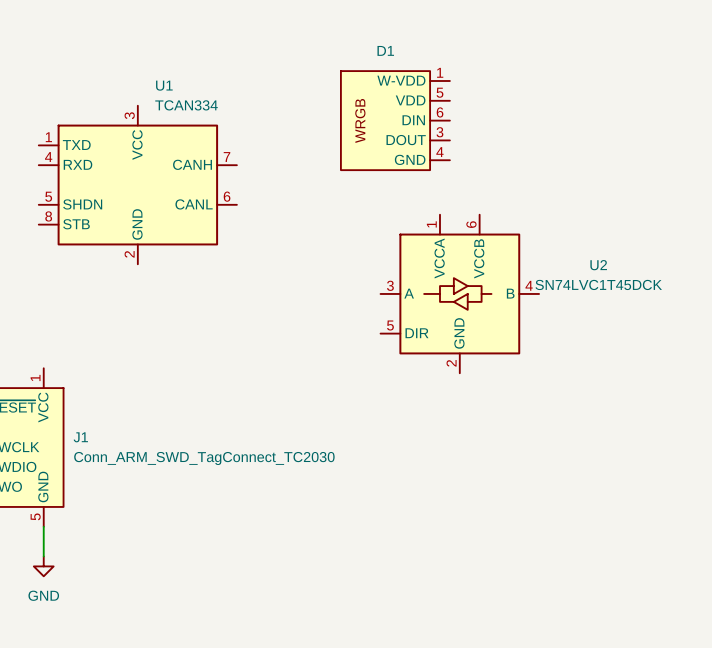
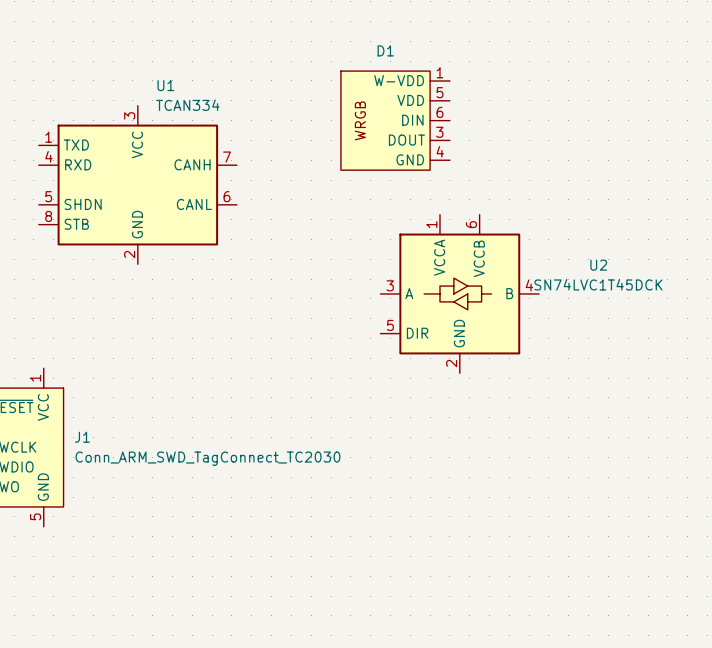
wire: (43, 526) (43, 556) -> none
power symbol: GND (43, 566) -> none

